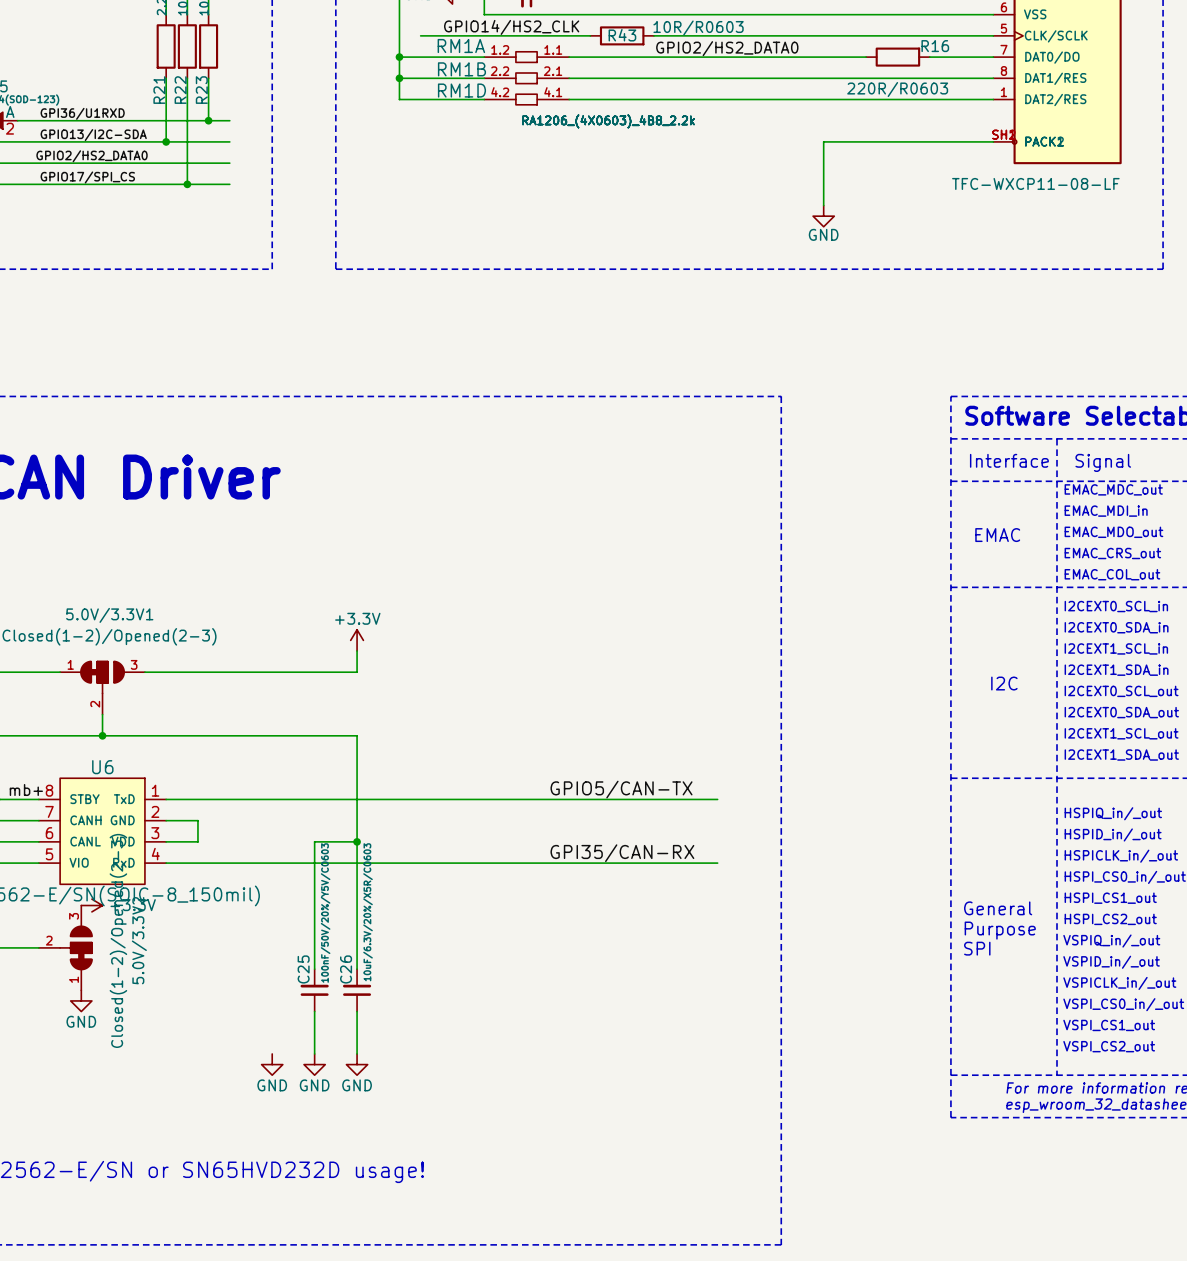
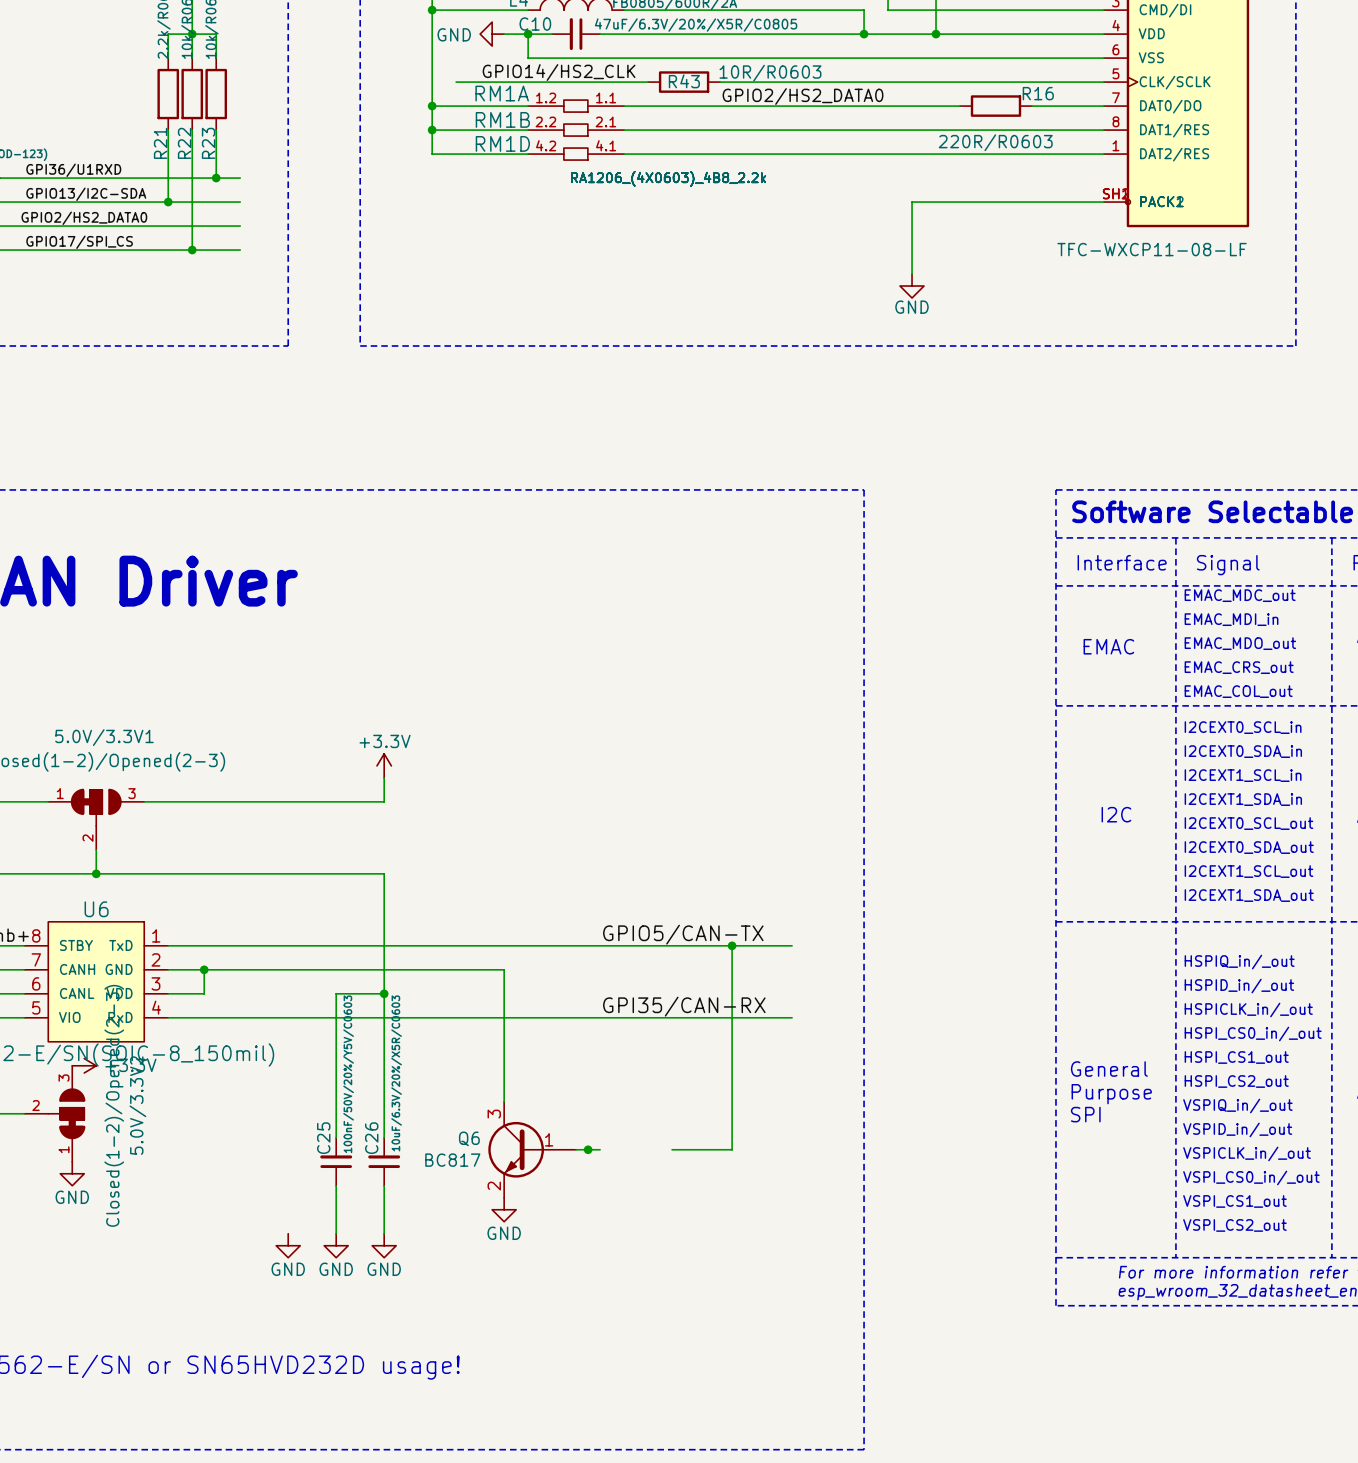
wire: none -> (732, 945) (732, 1149) (672, 1149)
junction: none -> (732, 945)
wire: none -> (204, 969) (504, 969) (504, 1101)
junction: none -> (204, 969)
Q6: none -> BC817 (532, 1149)
wire: none -> (576, 1149) (600, 1149)
junction: none -> (588, 1149)
power symbol: none -> GND (504, 1209)

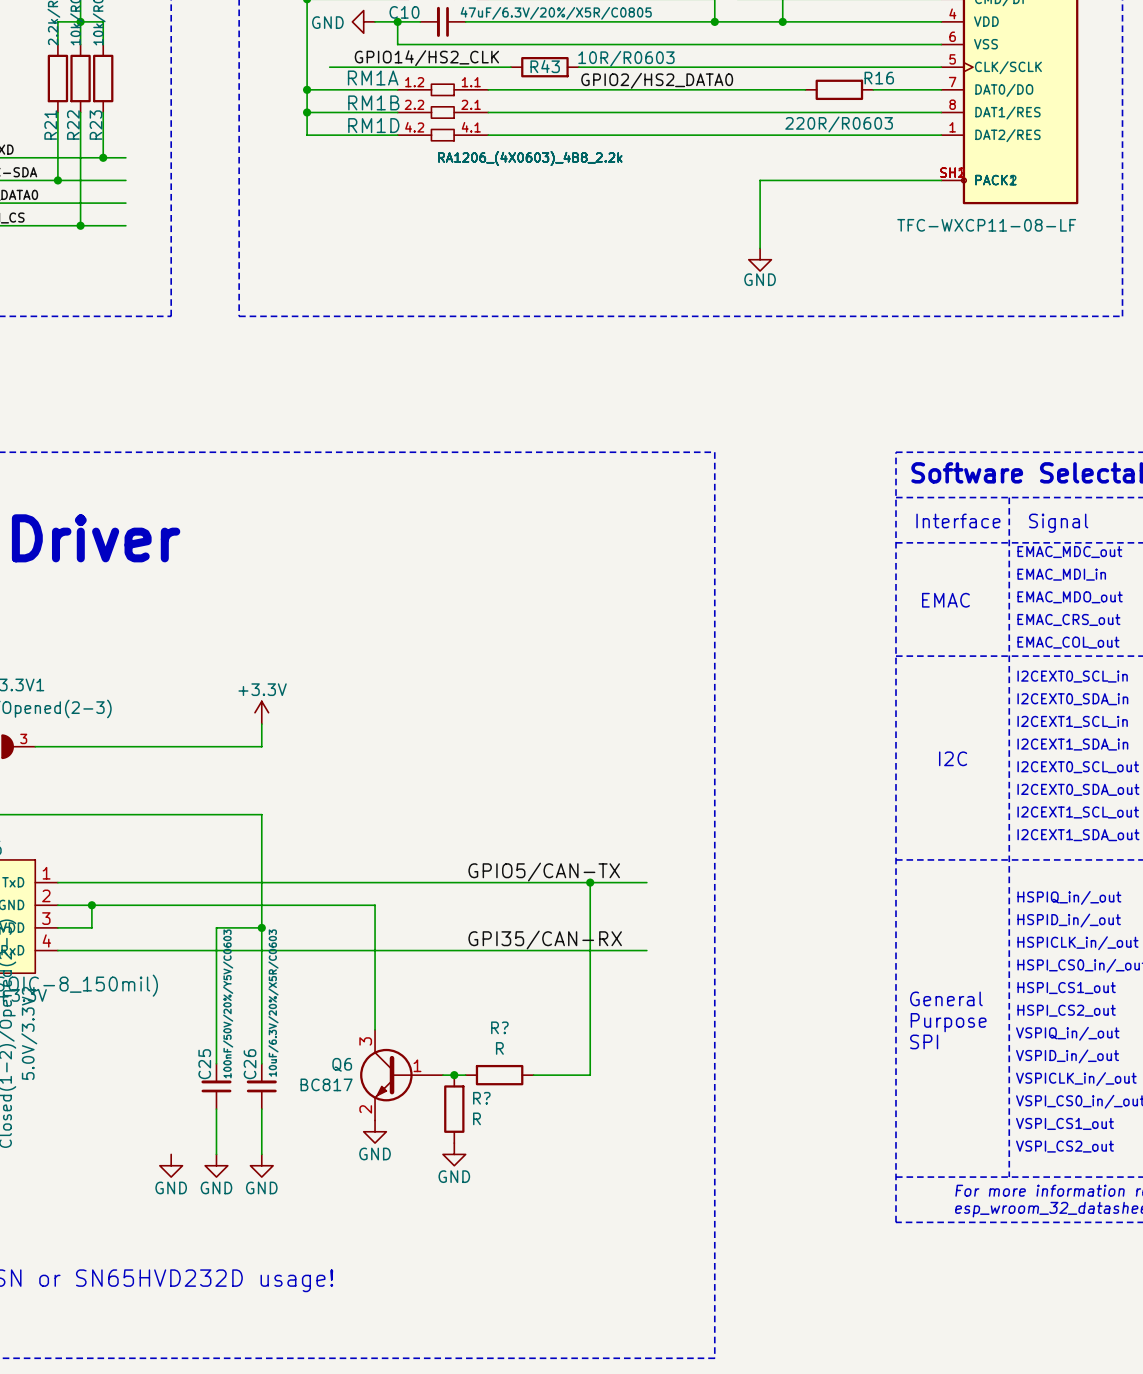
R?: none -> R (499, 1075)
R?: none -> R (454, 1109)
power symbol: none -> GND (454, 1154)

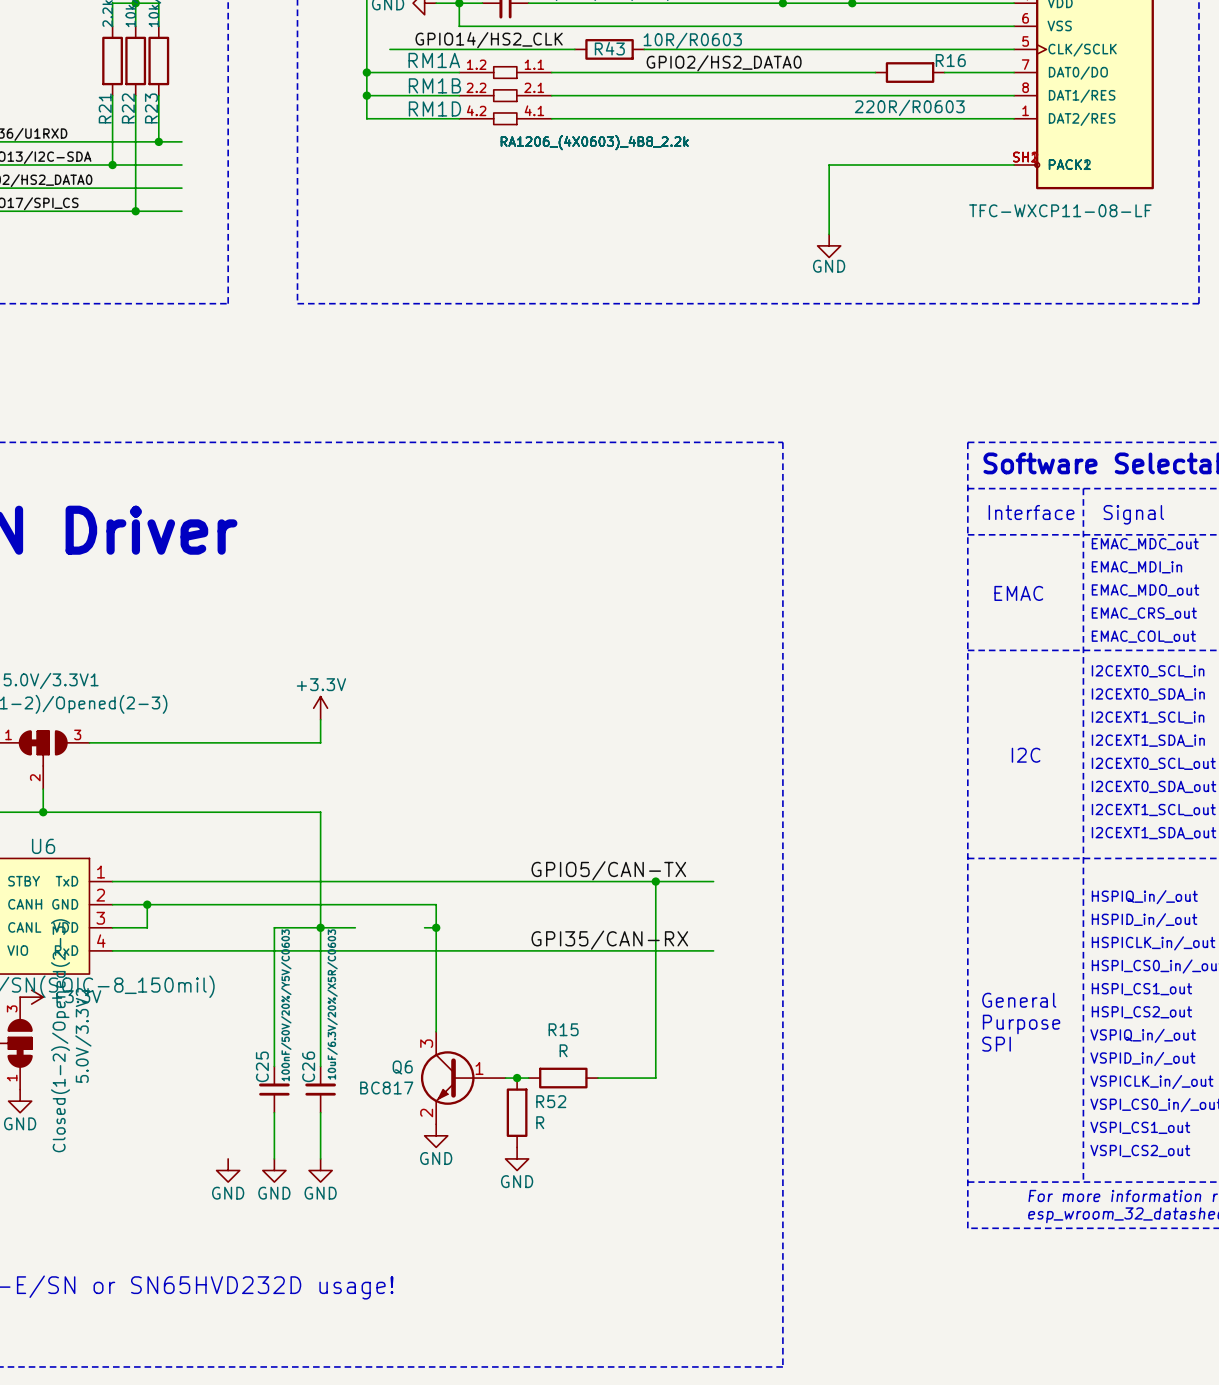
wire: none -> (320, 927) (355, 927)
wire: none -> (424, 927) (436, 927)
junction: none -> (436, 927)
R? name: R? (499, 1027) -> R15 (563, 1029)
R? name: R? (481, 1098) -> R52 (551, 1101)

